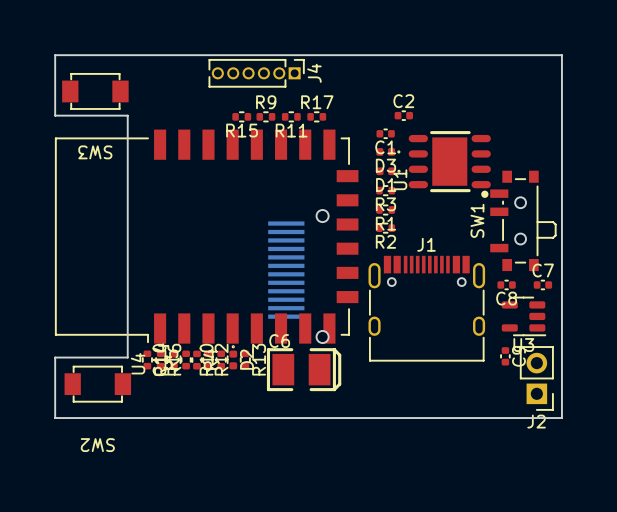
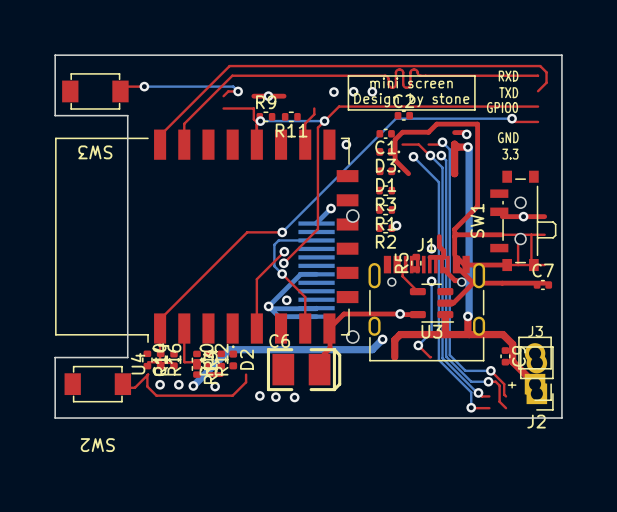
J4: (256, 73) -> none
line: none -> (348, 75) (474, 75) (474, 109) (348, 109) (348, 75)
top track: none -> (537, 75) (420, 75) (416, 70) (413, 69) (410, 72) (410, 85) (406, 87) (403, 85) (403, 72) (400, 69) (396, 71) (395, 85) (392, 87) (389, 86) (388, 77) (385, 75) (232, 75) (184, 123) (184, 144)
text: none -> RXD (508, 76)
text: none -> mini screen (411, 82)
top track: none -> (127, 86) (144, 86)
bottom track: none -> (144, 86) (233, 86) (238, 91)
via: none -> (144, 86)
top track: none -> (238, 91) (228, 91) (223, 96)
via: none -> (238, 91)
via: none -> (353, 91)
via: none -> (372, 91)
top track: none -> (538, 91) (546, 82) (546, 72) (540, 66) (229, 66) (160, 135) (160, 144)
via: none -> (333, 92)
text: none -> TXD (508, 92)
top track: none -> (253, 96) (284, 96)
via: none -> (268, 96)
text: none -> Design by stone (411, 100)
top track: none -> (538, 106) (339, 106) (317, 127) (317, 229) (283, 263)
text: none -> GPIO0 (502, 107)
top track: none -> (223, 108) (253, 108) (253, 119) (256, 122) (256, 144)
top track: none -> (314, 108) (314, 114) (305, 123) (305, 144)
R15: (241, 116) -> none
R17: (316, 116) -> none
top track: none -> (512, 118) (515, 121) (538, 121)
bottom track: none -> (512, 118) (395, 118) (282, 232)
via: none -> (512, 118)
bottom track: none -> (260, 121) (324, 121)
via: none -> (260, 121)
via: none -> (324, 121)
top track: none -> (454, 132) (464, 132) (466, 134)
via: none -> (466, 134)
text: none -> GND (508, 137)
top track: none -> (442, 142) (440, 144) (428, 144)
bottom track: none -> (442, 142) (449, 149) (449, 355) (465, 370) (490, 370)
via: none -> (442, 142)
via: none -> (346, 144)
top track: none -> (402, 144) (418, 144) (430, 155)
top track: none -> (467, 147) (457, 147) (454, 144) (454, 173)
bottom track: none -> (467, 147) (467, 316)
via: none -> (467, 147)
text: none -> 3.3 (510, 154)
bottom track: none -> (430, 155) (442, 167) (442, 358) (478, 392)
via: none -> (430, 155)
bottom track: none -> (441, 155) (446, 160) (446, 356) (471, 381) (488, 381)
via: none -> (441, 155)
bottom track: none -> (413, 156) (438, 182) (438, 359) (471, 392) (471, 407)
via: none -> (413, 156)
U1: (449, 164) -> none
top track: none -> (408, 173) (395, 160) (395, 139) (402, 132) (428, 132) (436, 124) (477, 124) (477, 206) (454, 229) (454, 255)
bottom track: none -> (331, 208) (316, 223)
via: none -> (331, 208)
top track: none -> (502, 216) (544, 216)
via: none -> (523, 216)
via: none -> (396, 225)
top track: none -> (282, 232) (247, 232) (160, 319) (160, 361) (172, 362)
via: none -> (282, 232)
top track: none -> (518, 234) (518, 265)
top track: none -> (531, 234) (531, 265)
top track: none -> (544, 234) (456, 234) (454, 236)
top track: none -> (439, 236) (439, 246) (443, 251) (443, 257) (429, 257)
bottom track: none -> (316, 240) (278, 240) (274, 244) (274, 266) (282, 274)
via: none -> (431, 248)
top track: none -> (284, 251) (256, 279) (256, 328)
via: none -> (284, 251)
top track: none -> (457, 257) (464, 265) (544, 265)
via: none -> (283, 263)
top track: none -> (402, 269) (402, 276) (417, 291)
top track: none -> (443, 269) (455, 280) (458, 280)
top track: none -> (459, 269) (473, 283)
top track: none -> (282, 274) (305, 297) (305, 328)
via: none -> (282, 274)
bottom track: none -> (316, 274) (300, 274) (268, 306) (278, 316) (316, 316)
part position: (298, 276) -> (328, 276)
bottom track: none -> (431, 281) (431, 332) (418, 345)
via: none -> (431, 281)
top track: none -> (473, 283) (453, 303) (445, 303)
top track: none -> (473, 283) (544, 283)
C8: (506, 284) -> none
via: none -> (286, 300)
via: none -> (268, 306)
bottom track: none -> (316, 308) (270, 308)
via: none -> (400, 314)
top track: none -> (417, 314) (343, 314) (329, 328) (330, 348) (323, 354) (323, 368)
top track: none -> (445, 314) (444, 334)
top track: none -> (467, 316) (469, 334)
via: none -> (467, 316)
U3 position: (523, 316) -> (431, 303)
top track: none -> (184, 328) (184, 361) (196, 362)
bottom track: none -> (382, 339) (372, 349) (229, 349) (193, 385)
via: none -> (382, 339)
top track: none -> (418, 345) (431, 357)
via: none -> (418, 345)
top track: none -> (394, 357) (394, 340) (400, 334) (502, 334) (512, 344) (512, 361) (535, 384)
R5 position: (186, 359) -> (416, 263)
R13 position: (245, 359) -> (196, 368)
top track: none -> (148, 362) (160, 362)
J3: none -> (535, 368)
top track: none -> (490, 370) (504, 384) (504, 394) (506, 396)
via: none -> (490, 370)
top track: none -> (148, 374) (134, 387) (127, 387)
top track: none -> (209, 374) (221, 374)
top track: none -> (246, 374) (246, 382) (232, 395) (156, 395) (147, 386) (147, 375)
top track: none -> (488, 381) (495, 381) (499, 385) (499, 401) (506, 408)
via: none -> (488, 381)
via: none -> (160, 384)
via: none -> (178, 384)
via: none -> (193, 385)
text: none -> + (512, 385)
via: none -> (215, 386)
top track: none -> (478, 392) (482, 396) (489, 396)
via: none -> (478, 392)
via: none -> (259, 395)
via: none -> (275, 397)
via: none -> (294, 397)
top track: none -> (471, 407) (489, 408)
via: none -> (471, 407)

